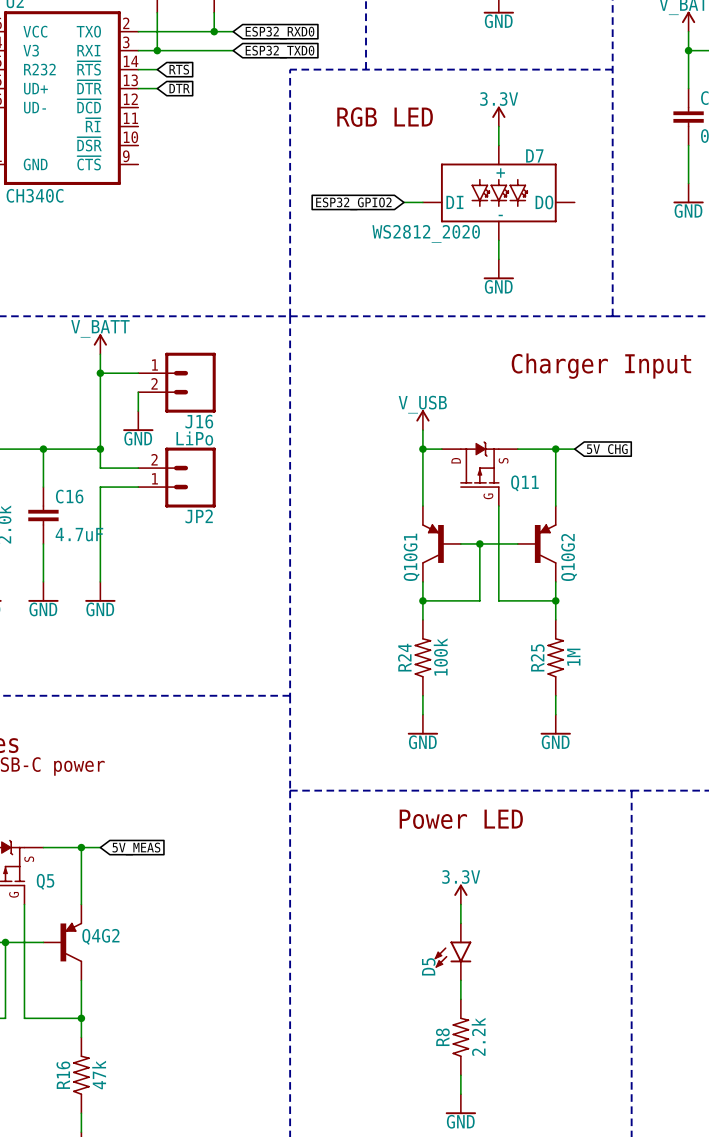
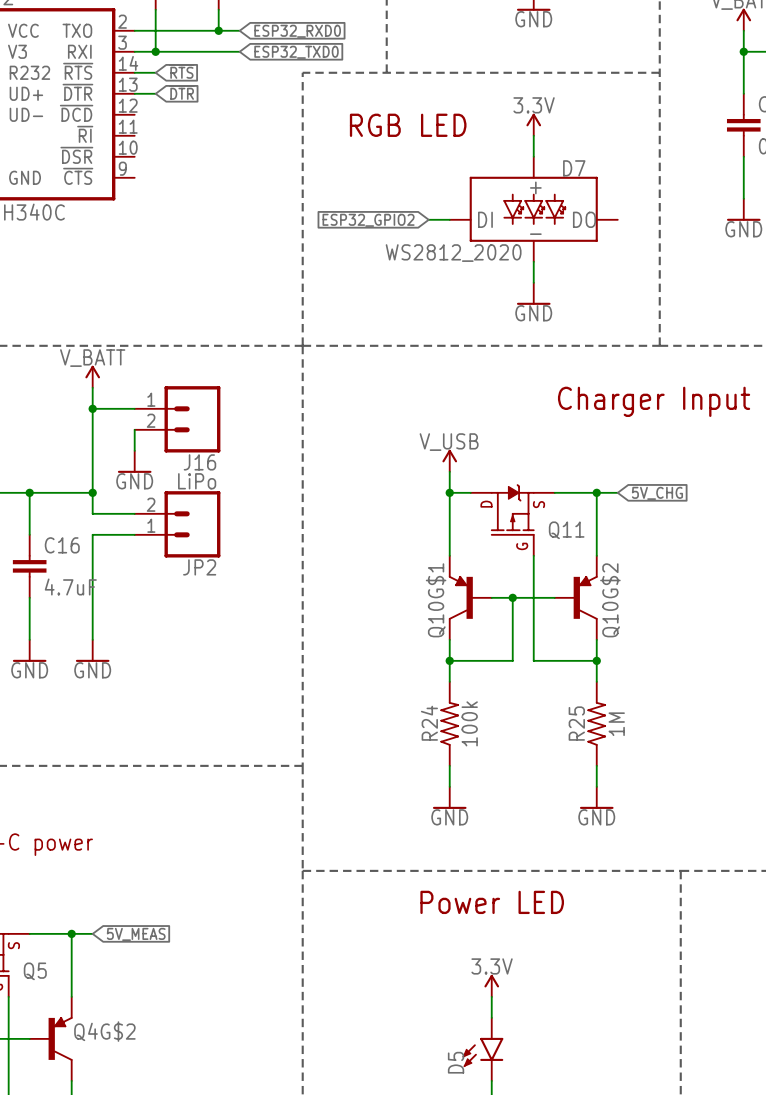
Q10G1 name: Q10G1 (411, 557) -> Q10G$1 (436, 600)
Q10G2 name: Q10G2 (569, 557) -> Q10G$2 (610, 600)
Q4G2 name: Q4G2 (100, 936) -> Q4G$2 (104, 1031)

